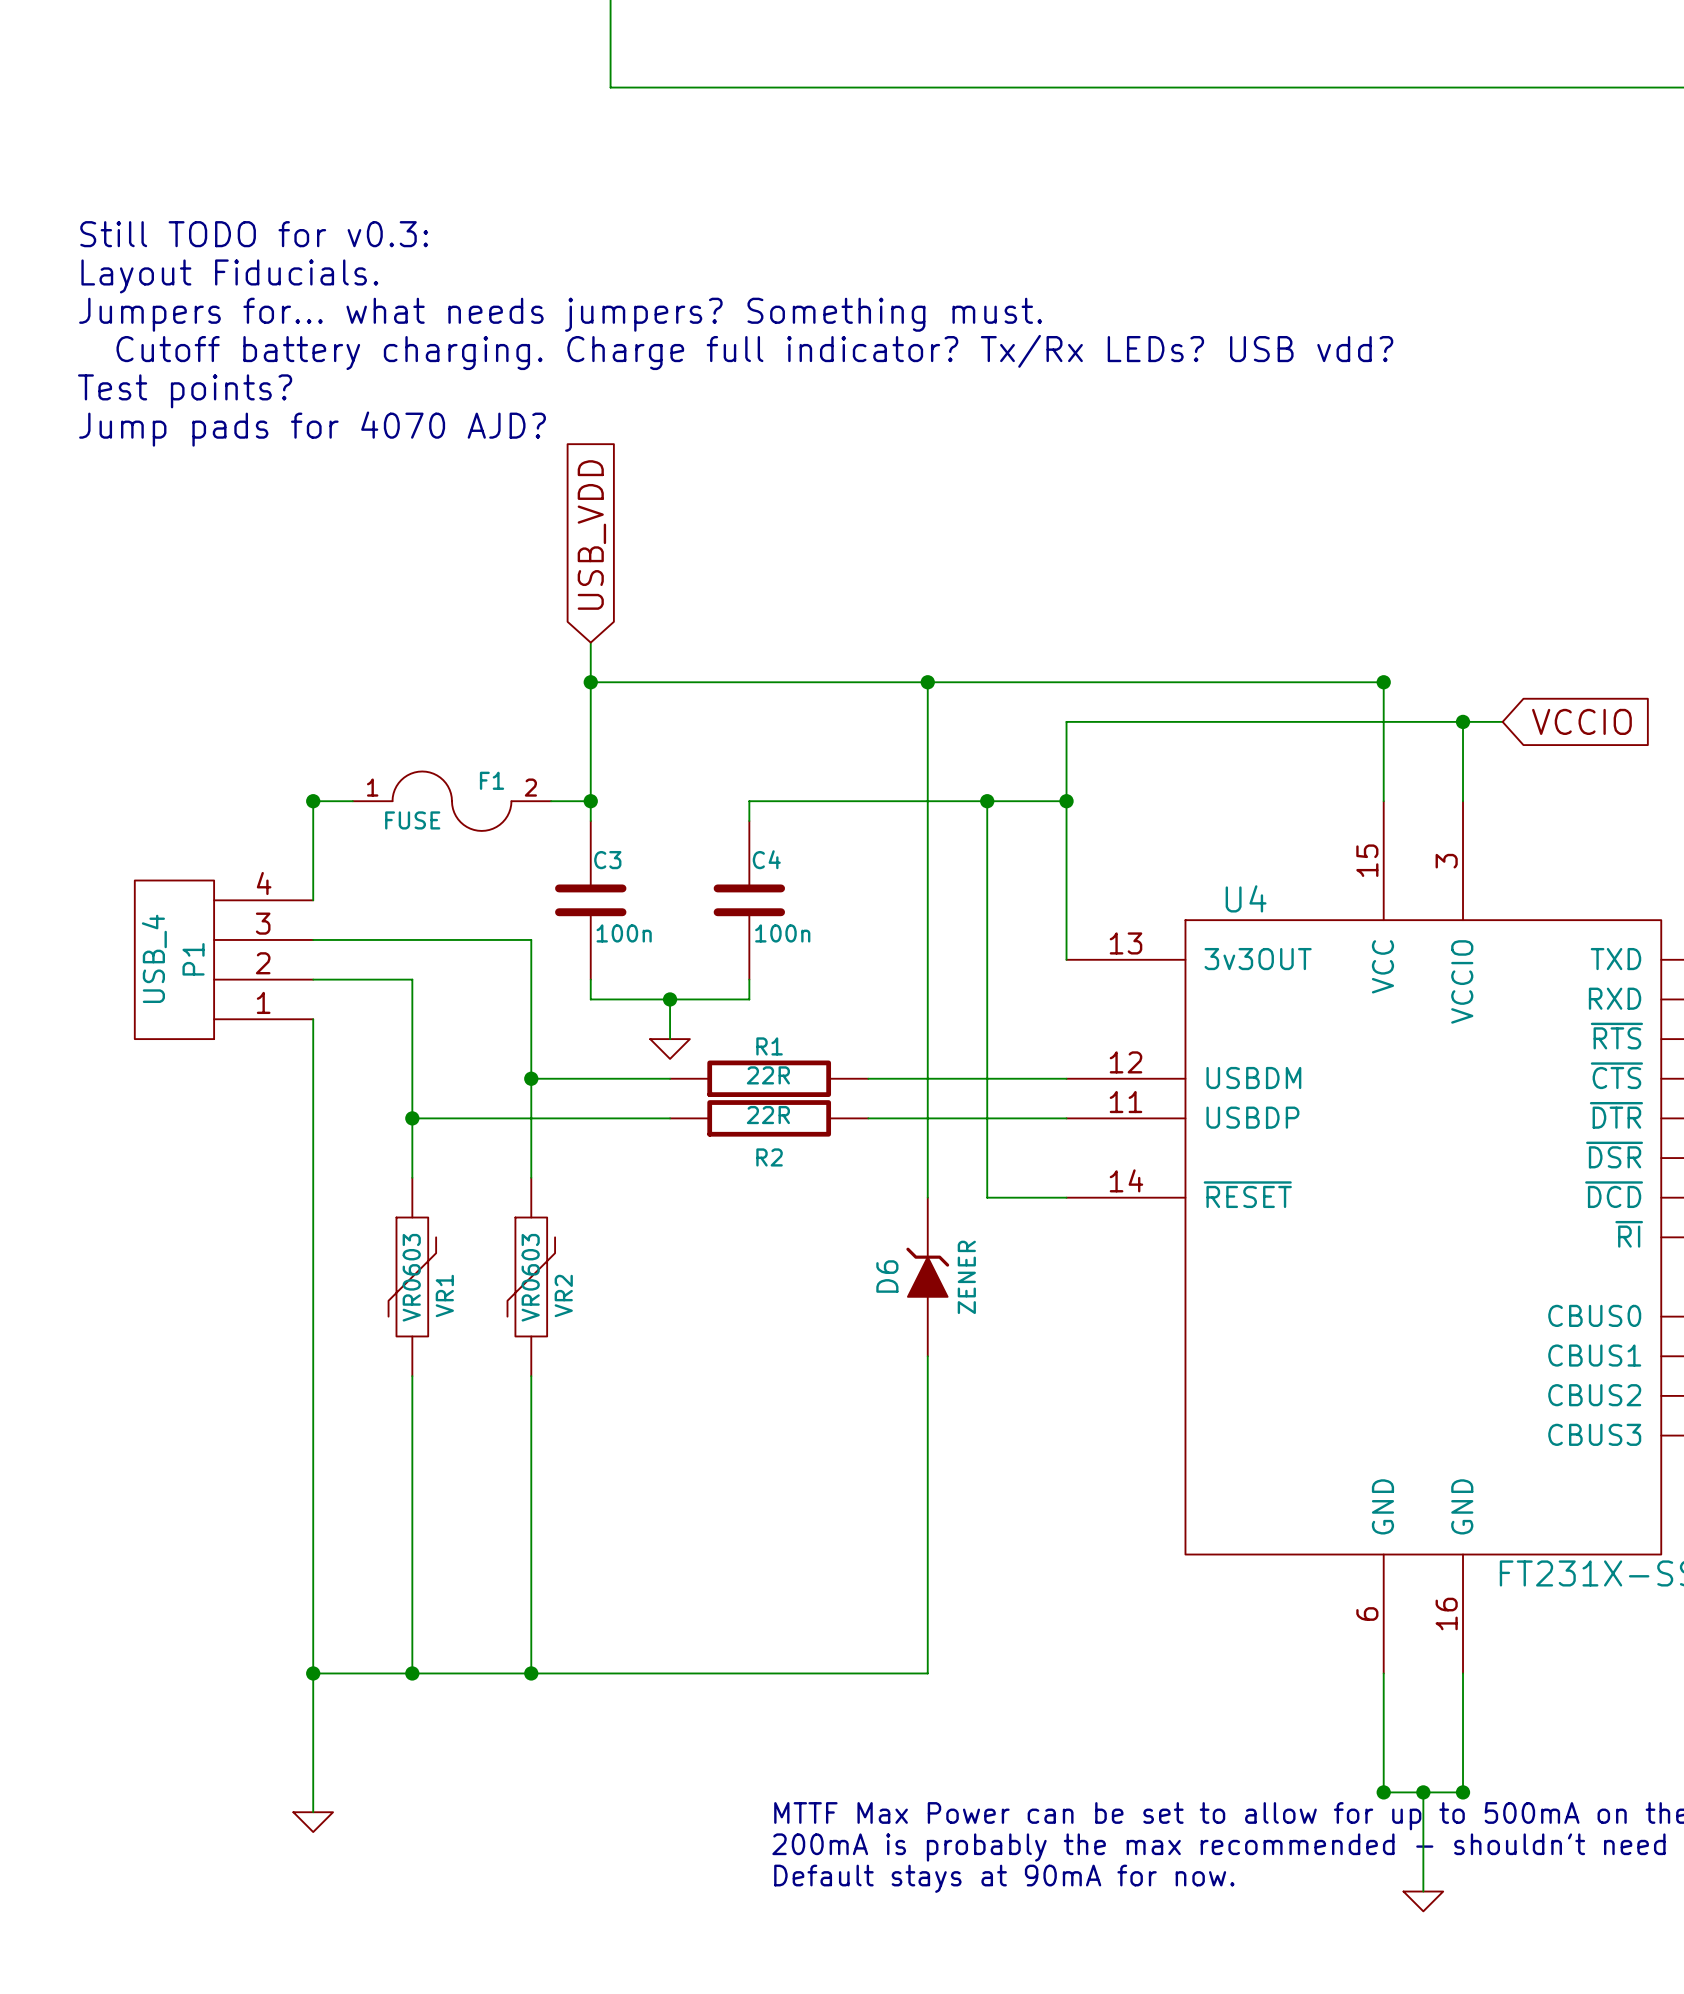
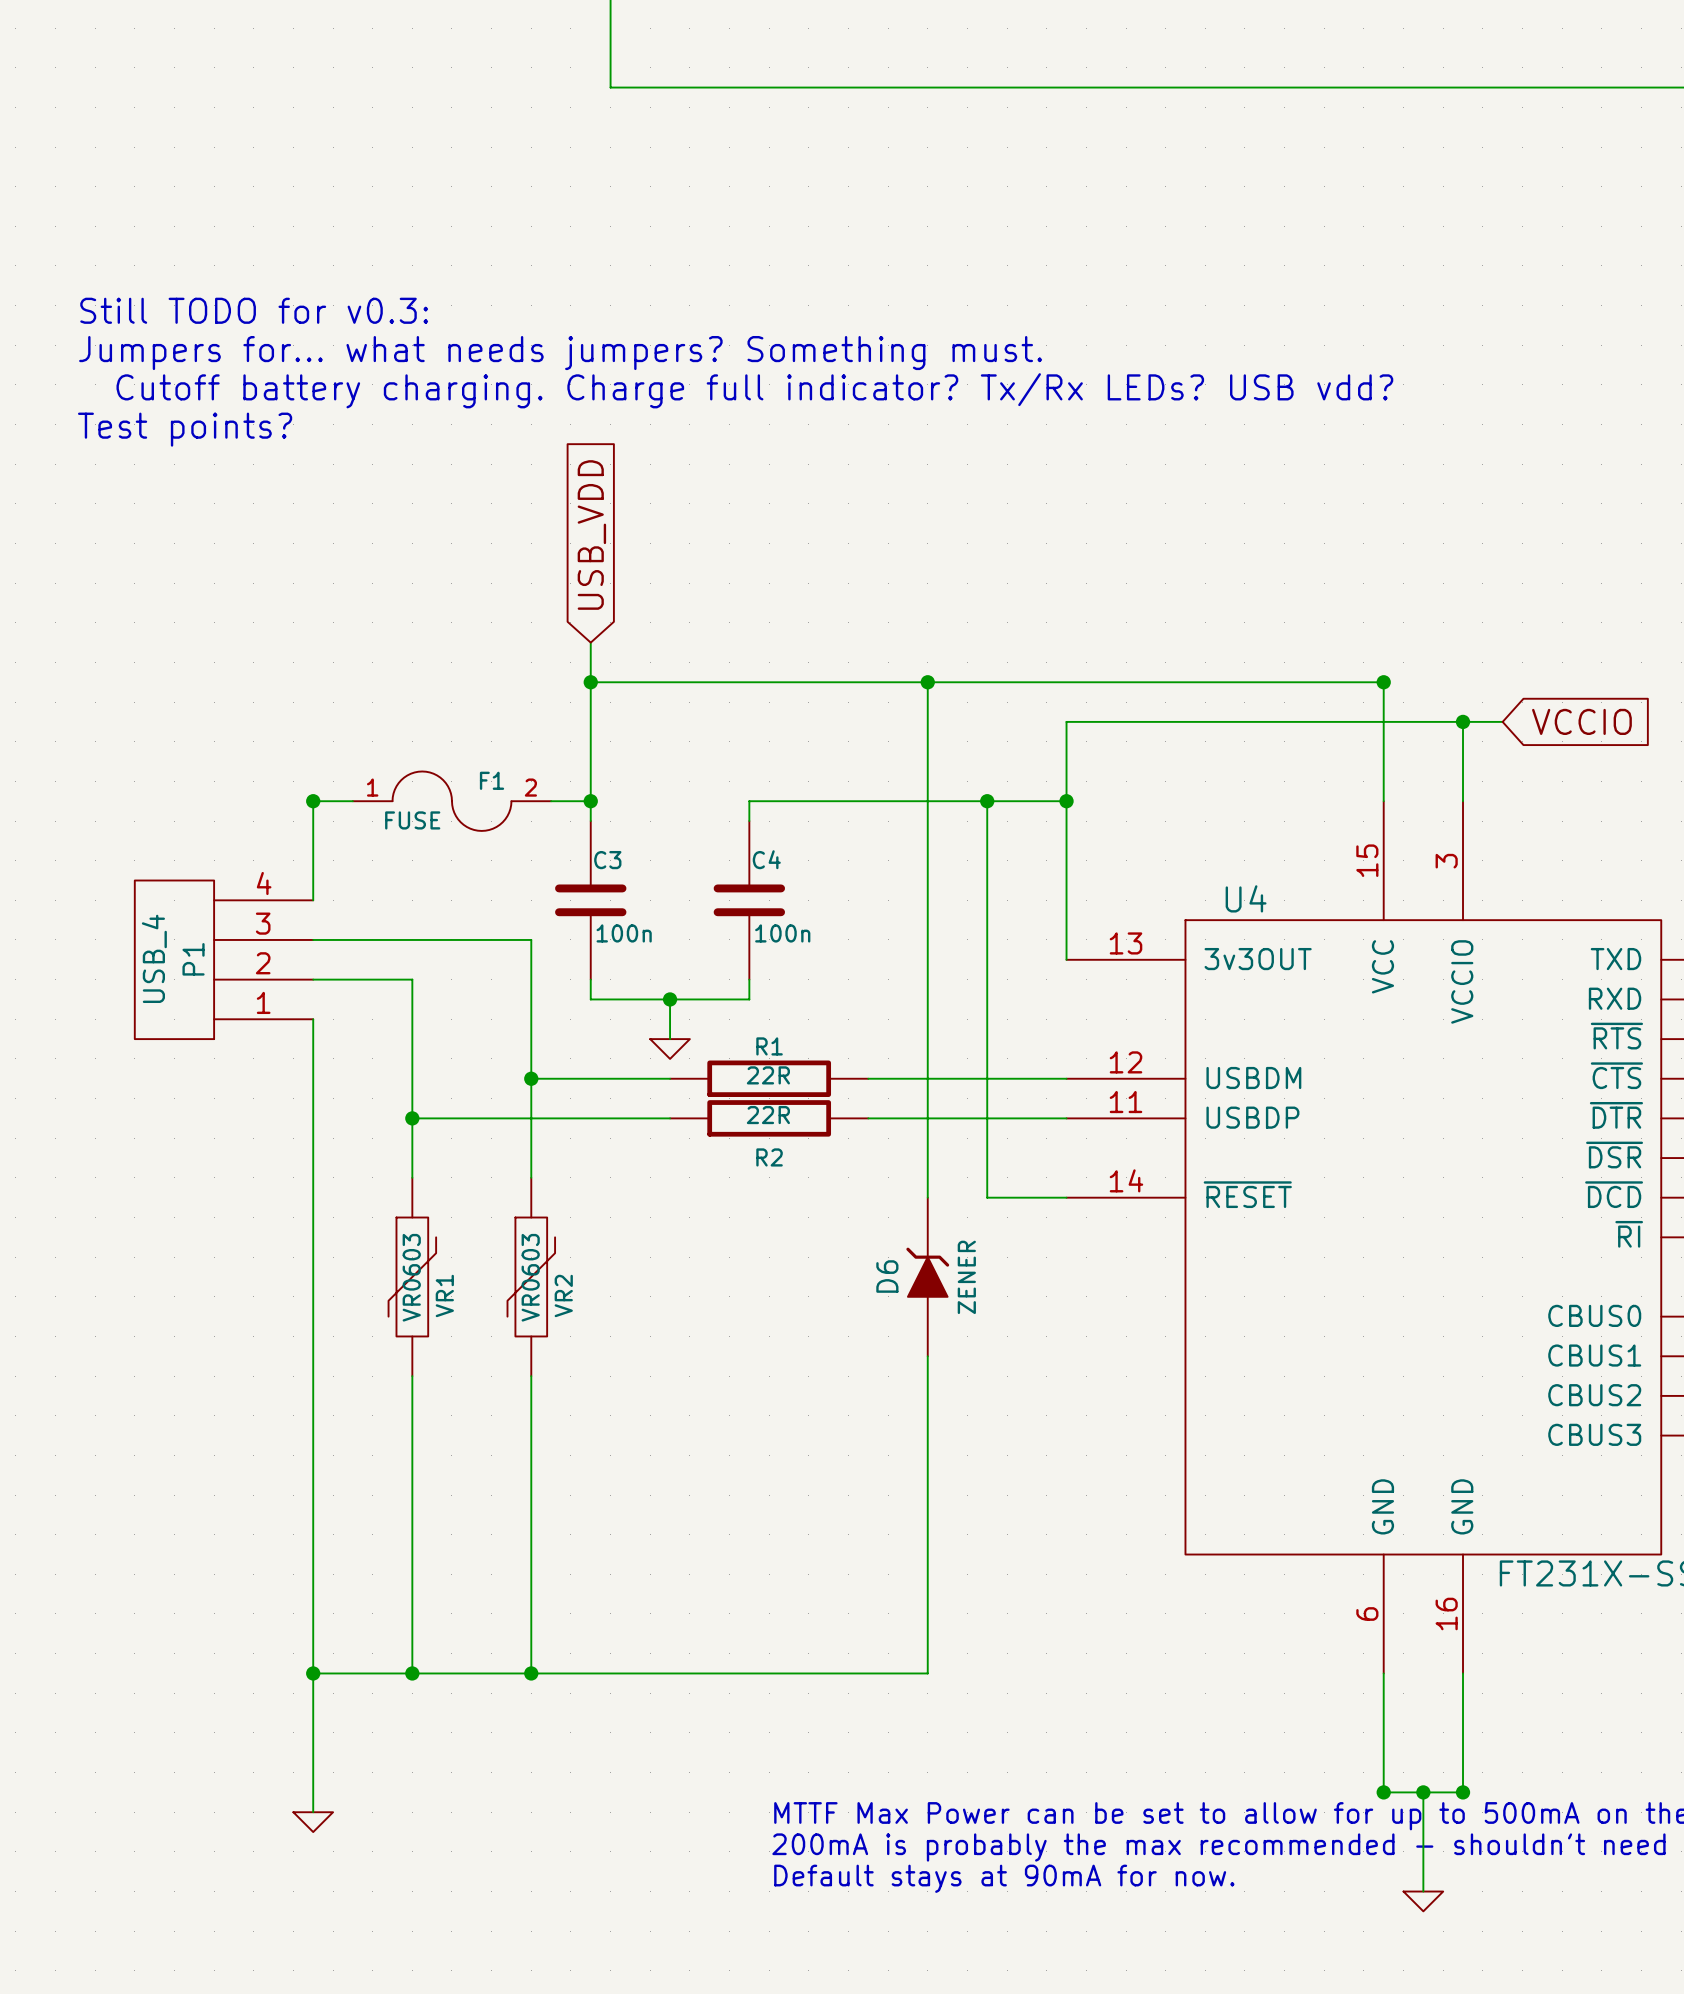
text: Still TODO for v0.3: (254, 234) -> none
text: Layout Fiducials. (229, 276) -> none
text: Jumpers for... what needs jumpers? Something must. (560, 314) -> Still TODO for v0.3: (254, 310)
text: Cutoff battery charging. Charge full indicator? Tx/Rx LEDs? USB vdd? (754, 352) -> Jumpers for... what needs jumpers? Something must. (560, 353)
text: Test points? (185, 391) -> Cutoff battery charging. Charge full indicator? Tx/Rx LEDs? USB vdd? (754, 390)
text: Jump pads for 4070 AJD? (312, 429) -> Test points? (185, 429)

